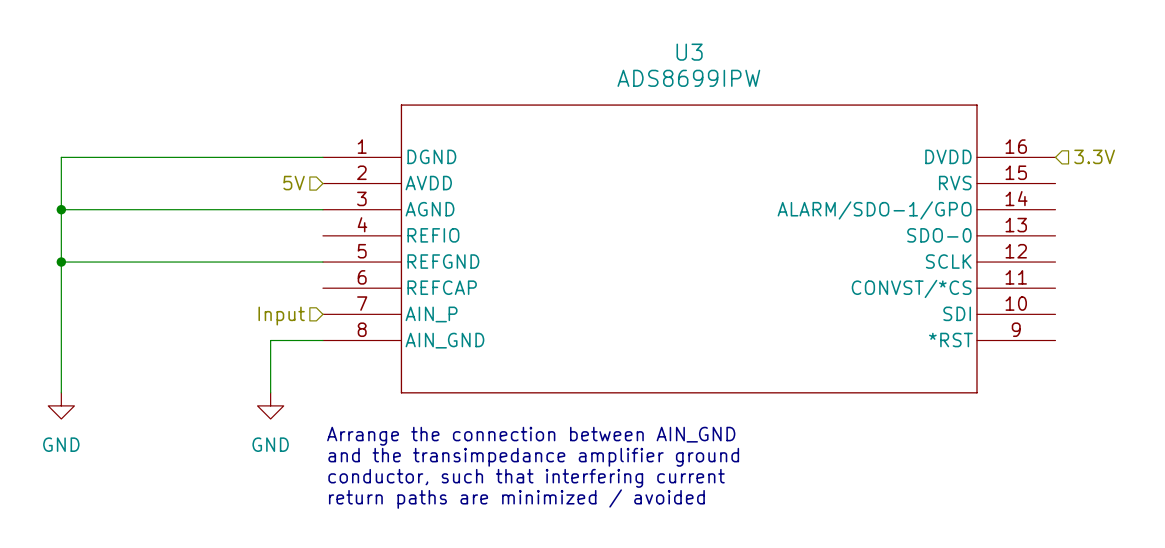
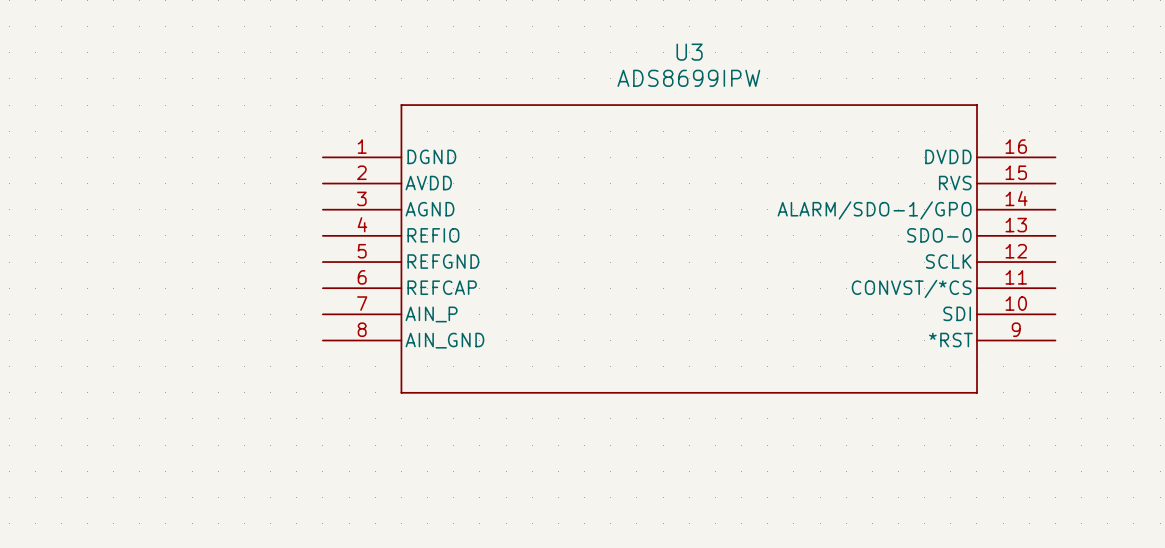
hierarchical label: 3.3V (1094, 156) -> none
wire: (322, 157) (61, 157) (61, 392) -> none
hierarchical label: 5V (294, 183) -> none
wire: (61, 209) (322, 209) -> none
junction: (61, 209) -> none
wire: (61, 262) (322, 262) -> none
junction: (61, 262) -> none
hierarchical label: Input (281, 316) -> none
wire: (322, 340) (270, 340) (270, 392) -> none
power symbol: GND (61, 405) -> none
power symbol: GND (270, 405) -> none
text: Arrange the connection between AIN_GND (531, 436) -> none
text: and the transimpedance amplifier ground (533, 457) -> none
text: conductor, such that interfering current (526, 478) -> none
text: return paths are minimized / avoided (516, 499) -> none

